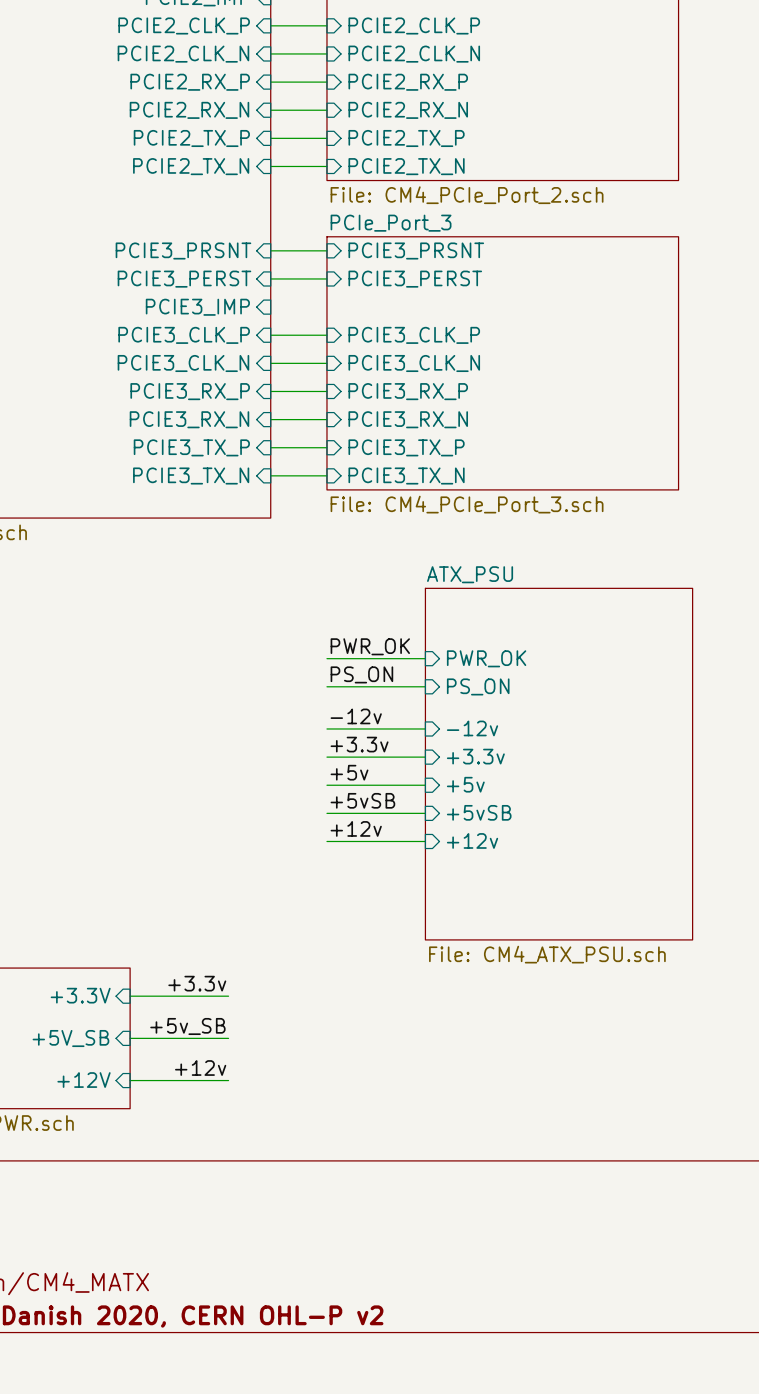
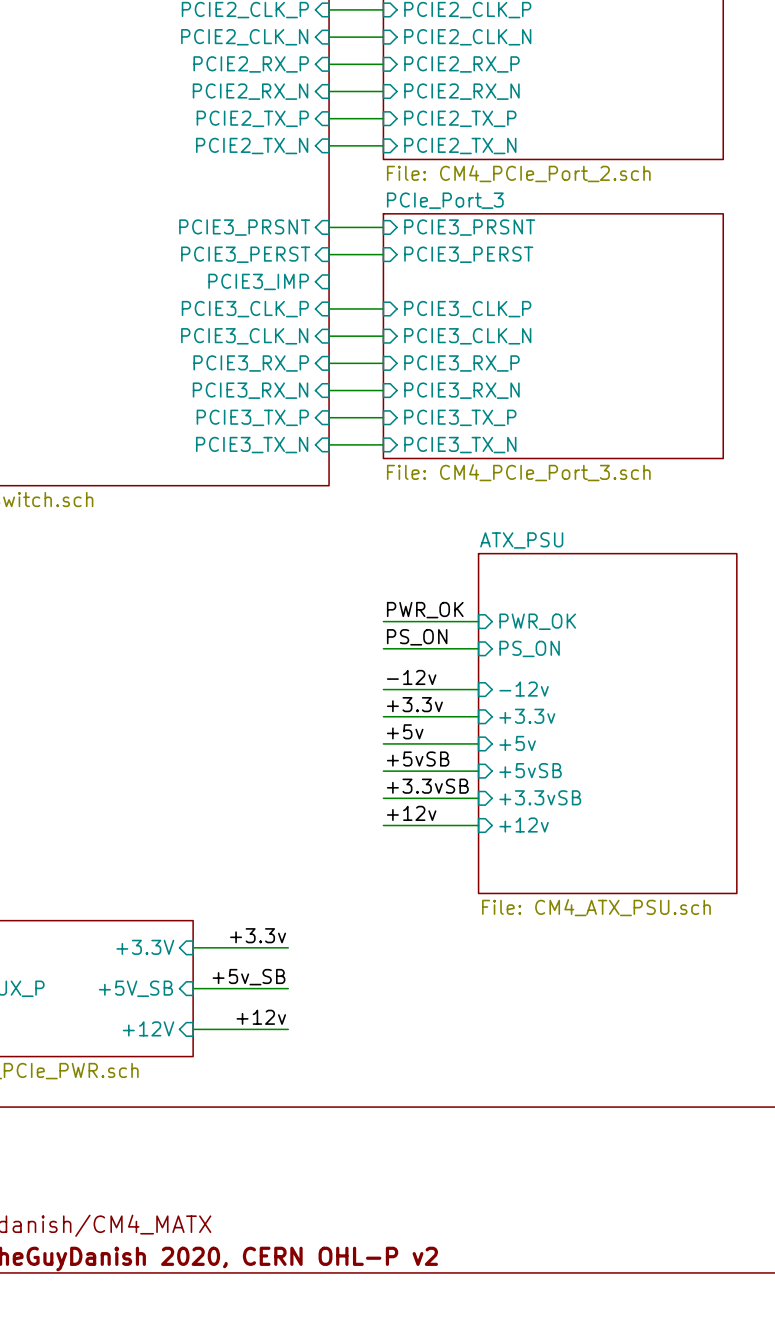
label: +12v (356, 828) -> +3.3vSB (427, 786)
sheet pin: +12v (472, 840) -> +3.3vSB (540, 797)
label: none -> +12v (411, 813)
wire: none -> (383, 825) (478, 825)
sheet pin: none -> +12v (524, 824)

